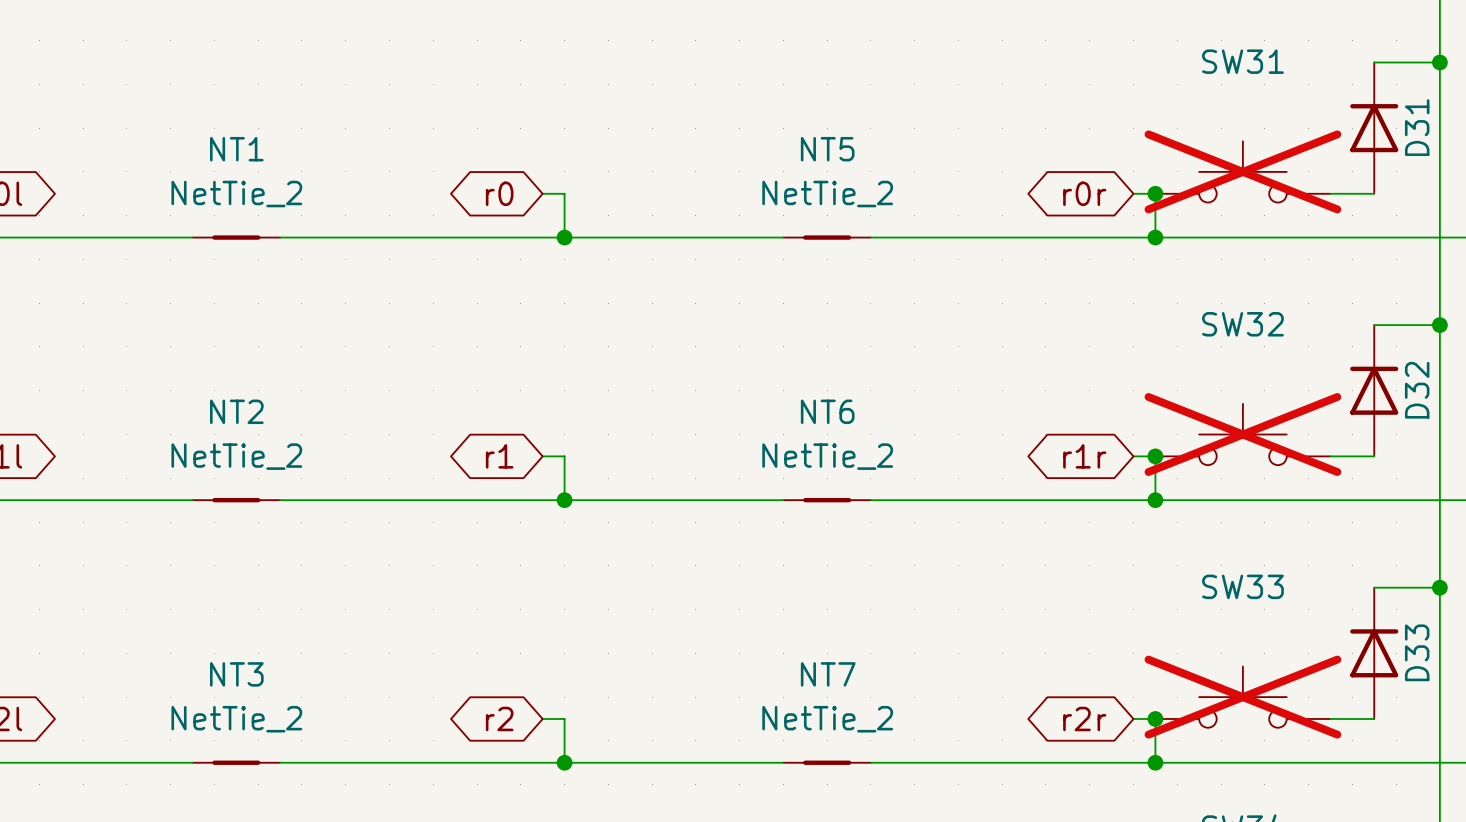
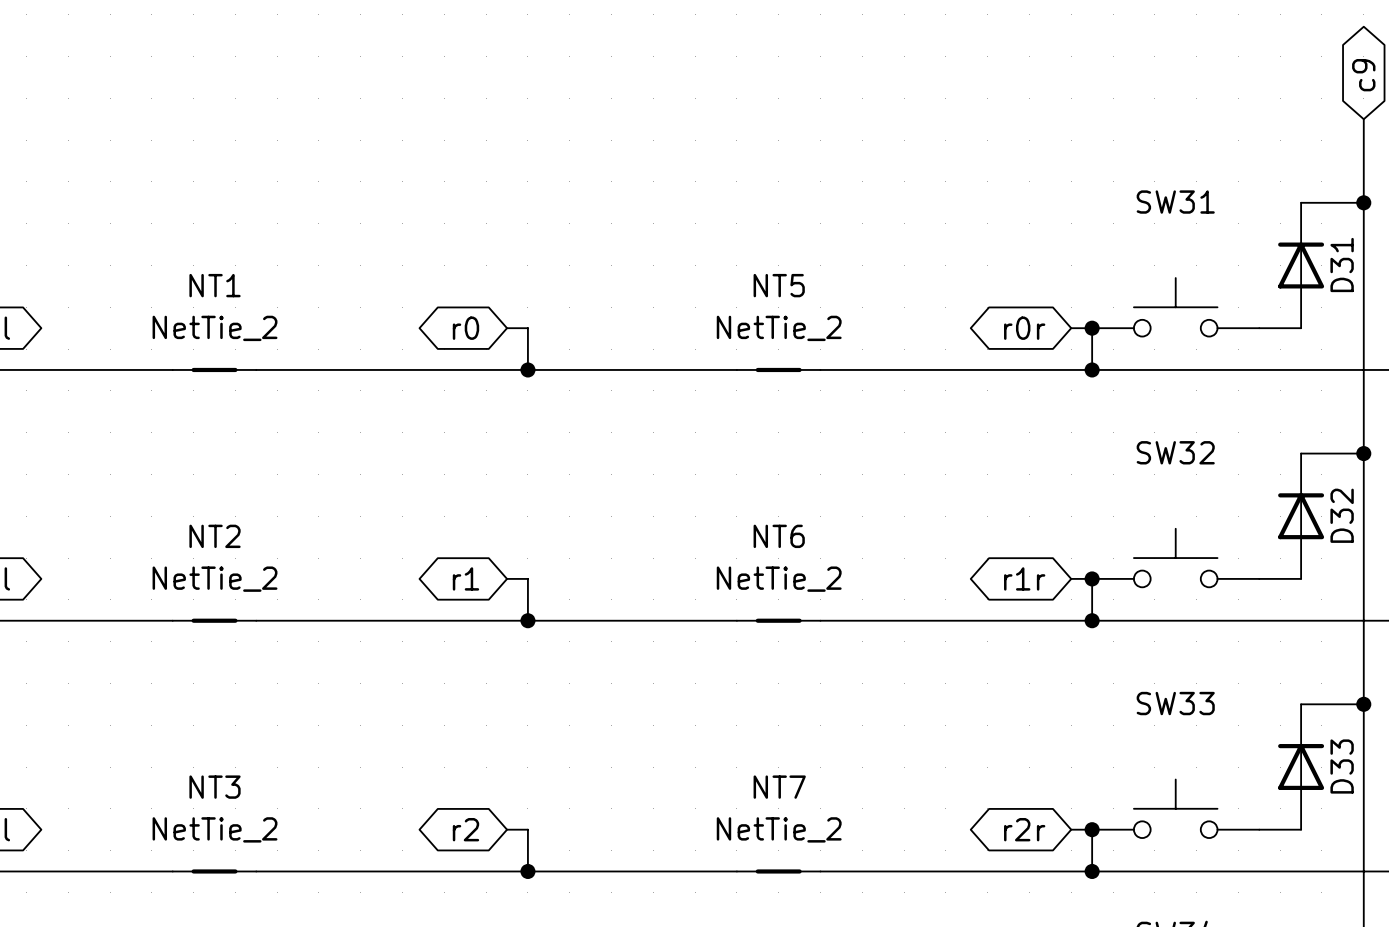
SW31 do-not-place cross: (1242, 171) -> none
SW32 do-not-place cross: (1242, 434) -> none
SW33 do-not-place cross: (1242, 697) -> none

